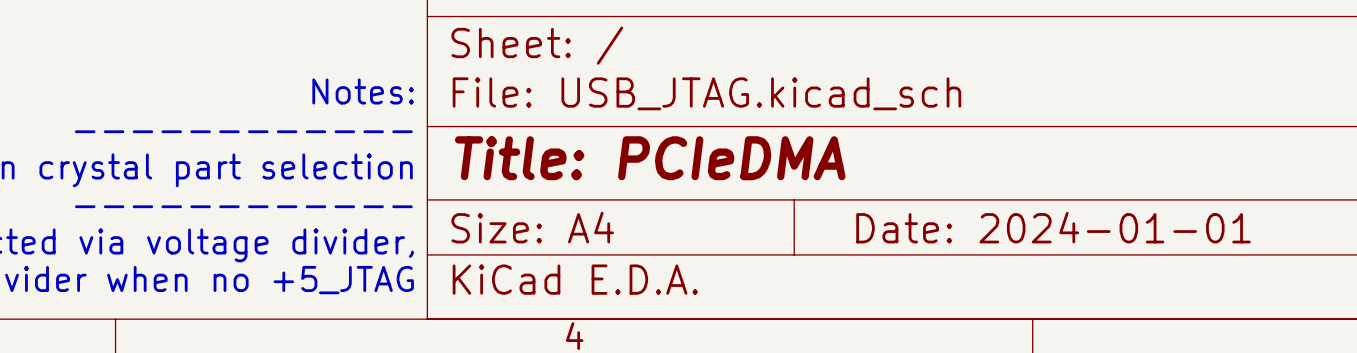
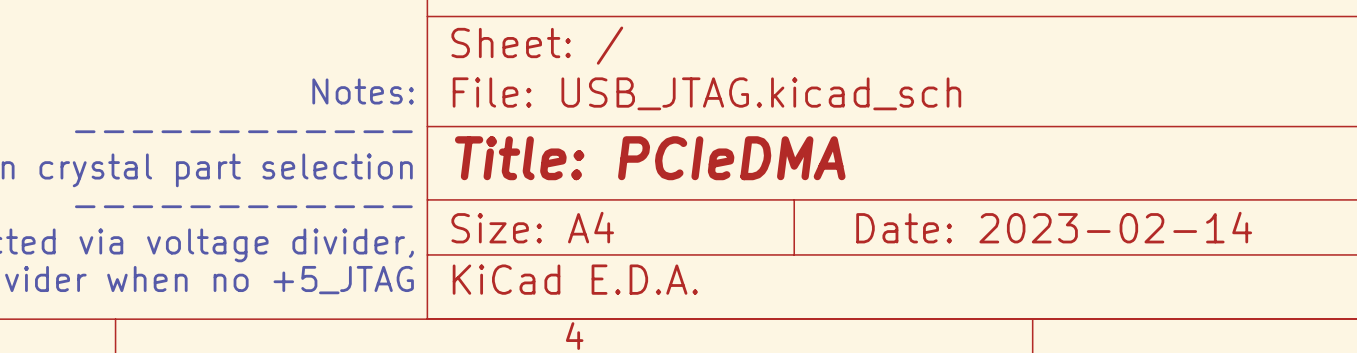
title block: Date: 2024-01-01 (1053, 227) -> Date: 2023-02-14 (1054, 227)

